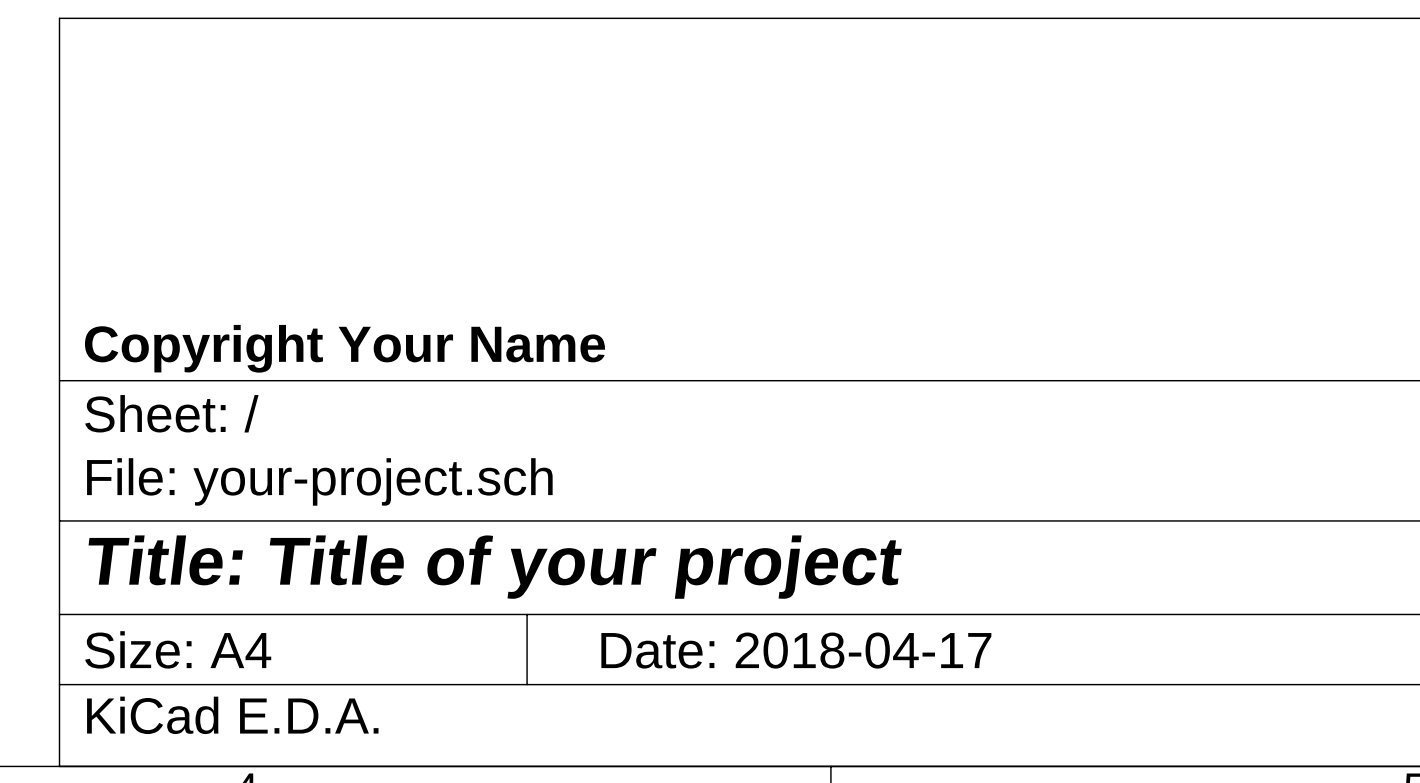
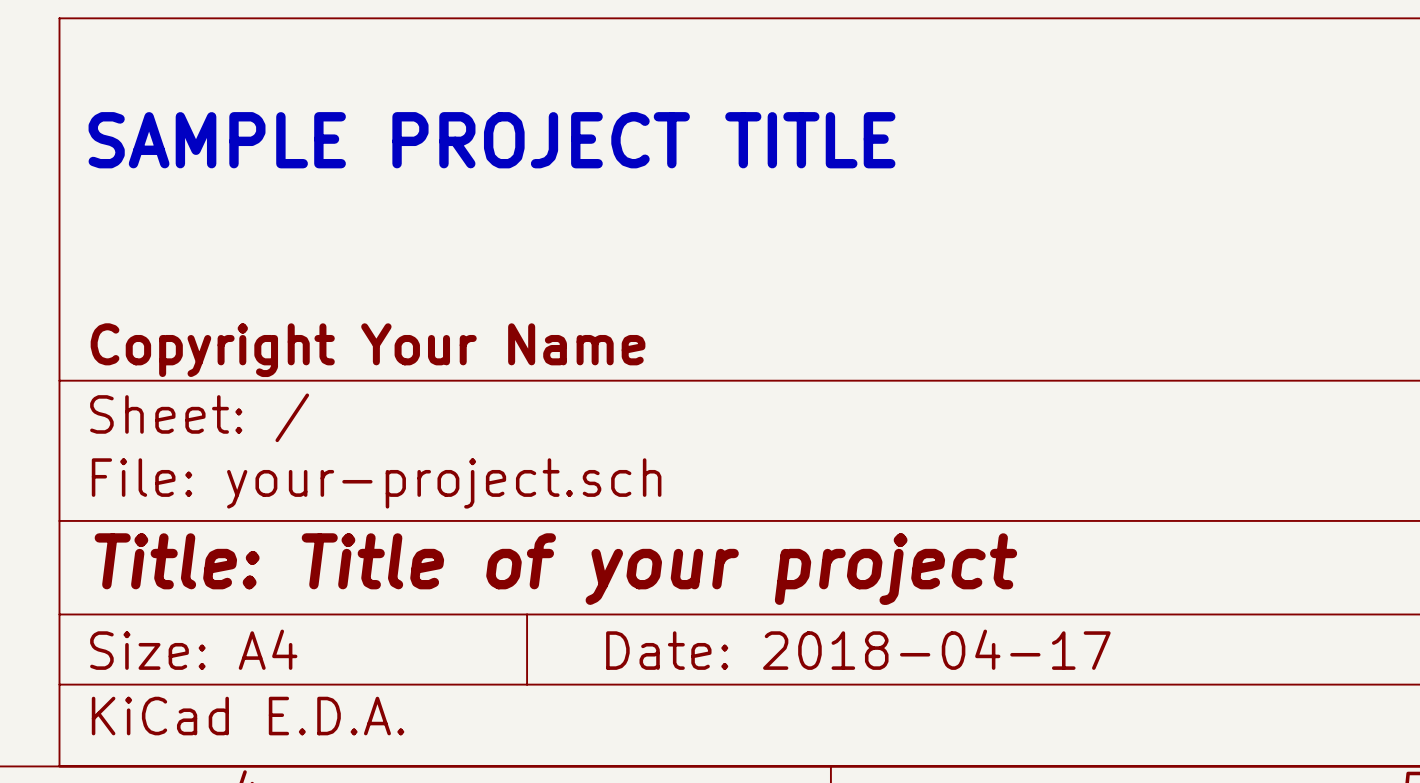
text: none -> SAMPLE PROJECT TITLE (492, 140)

